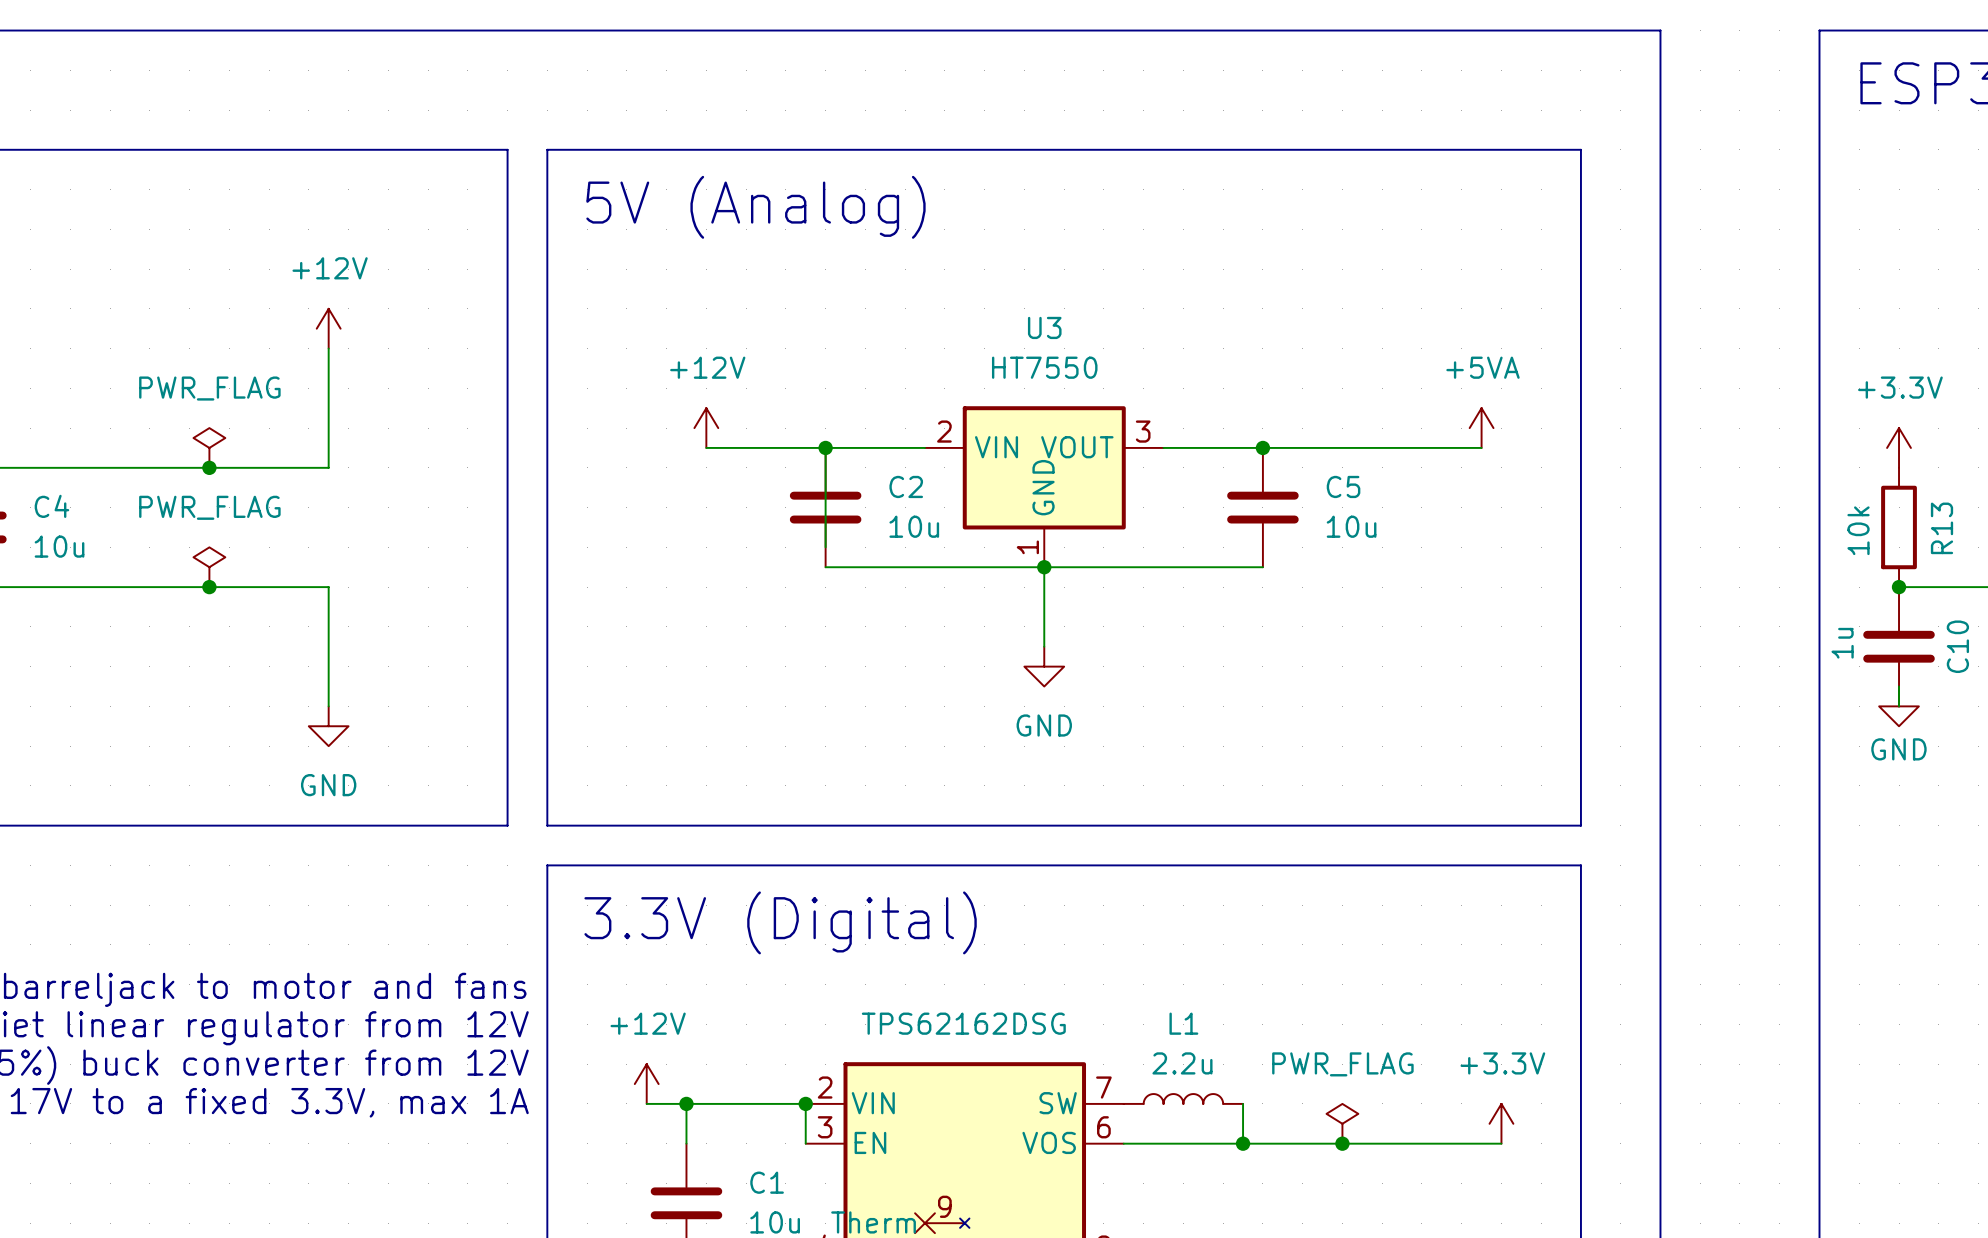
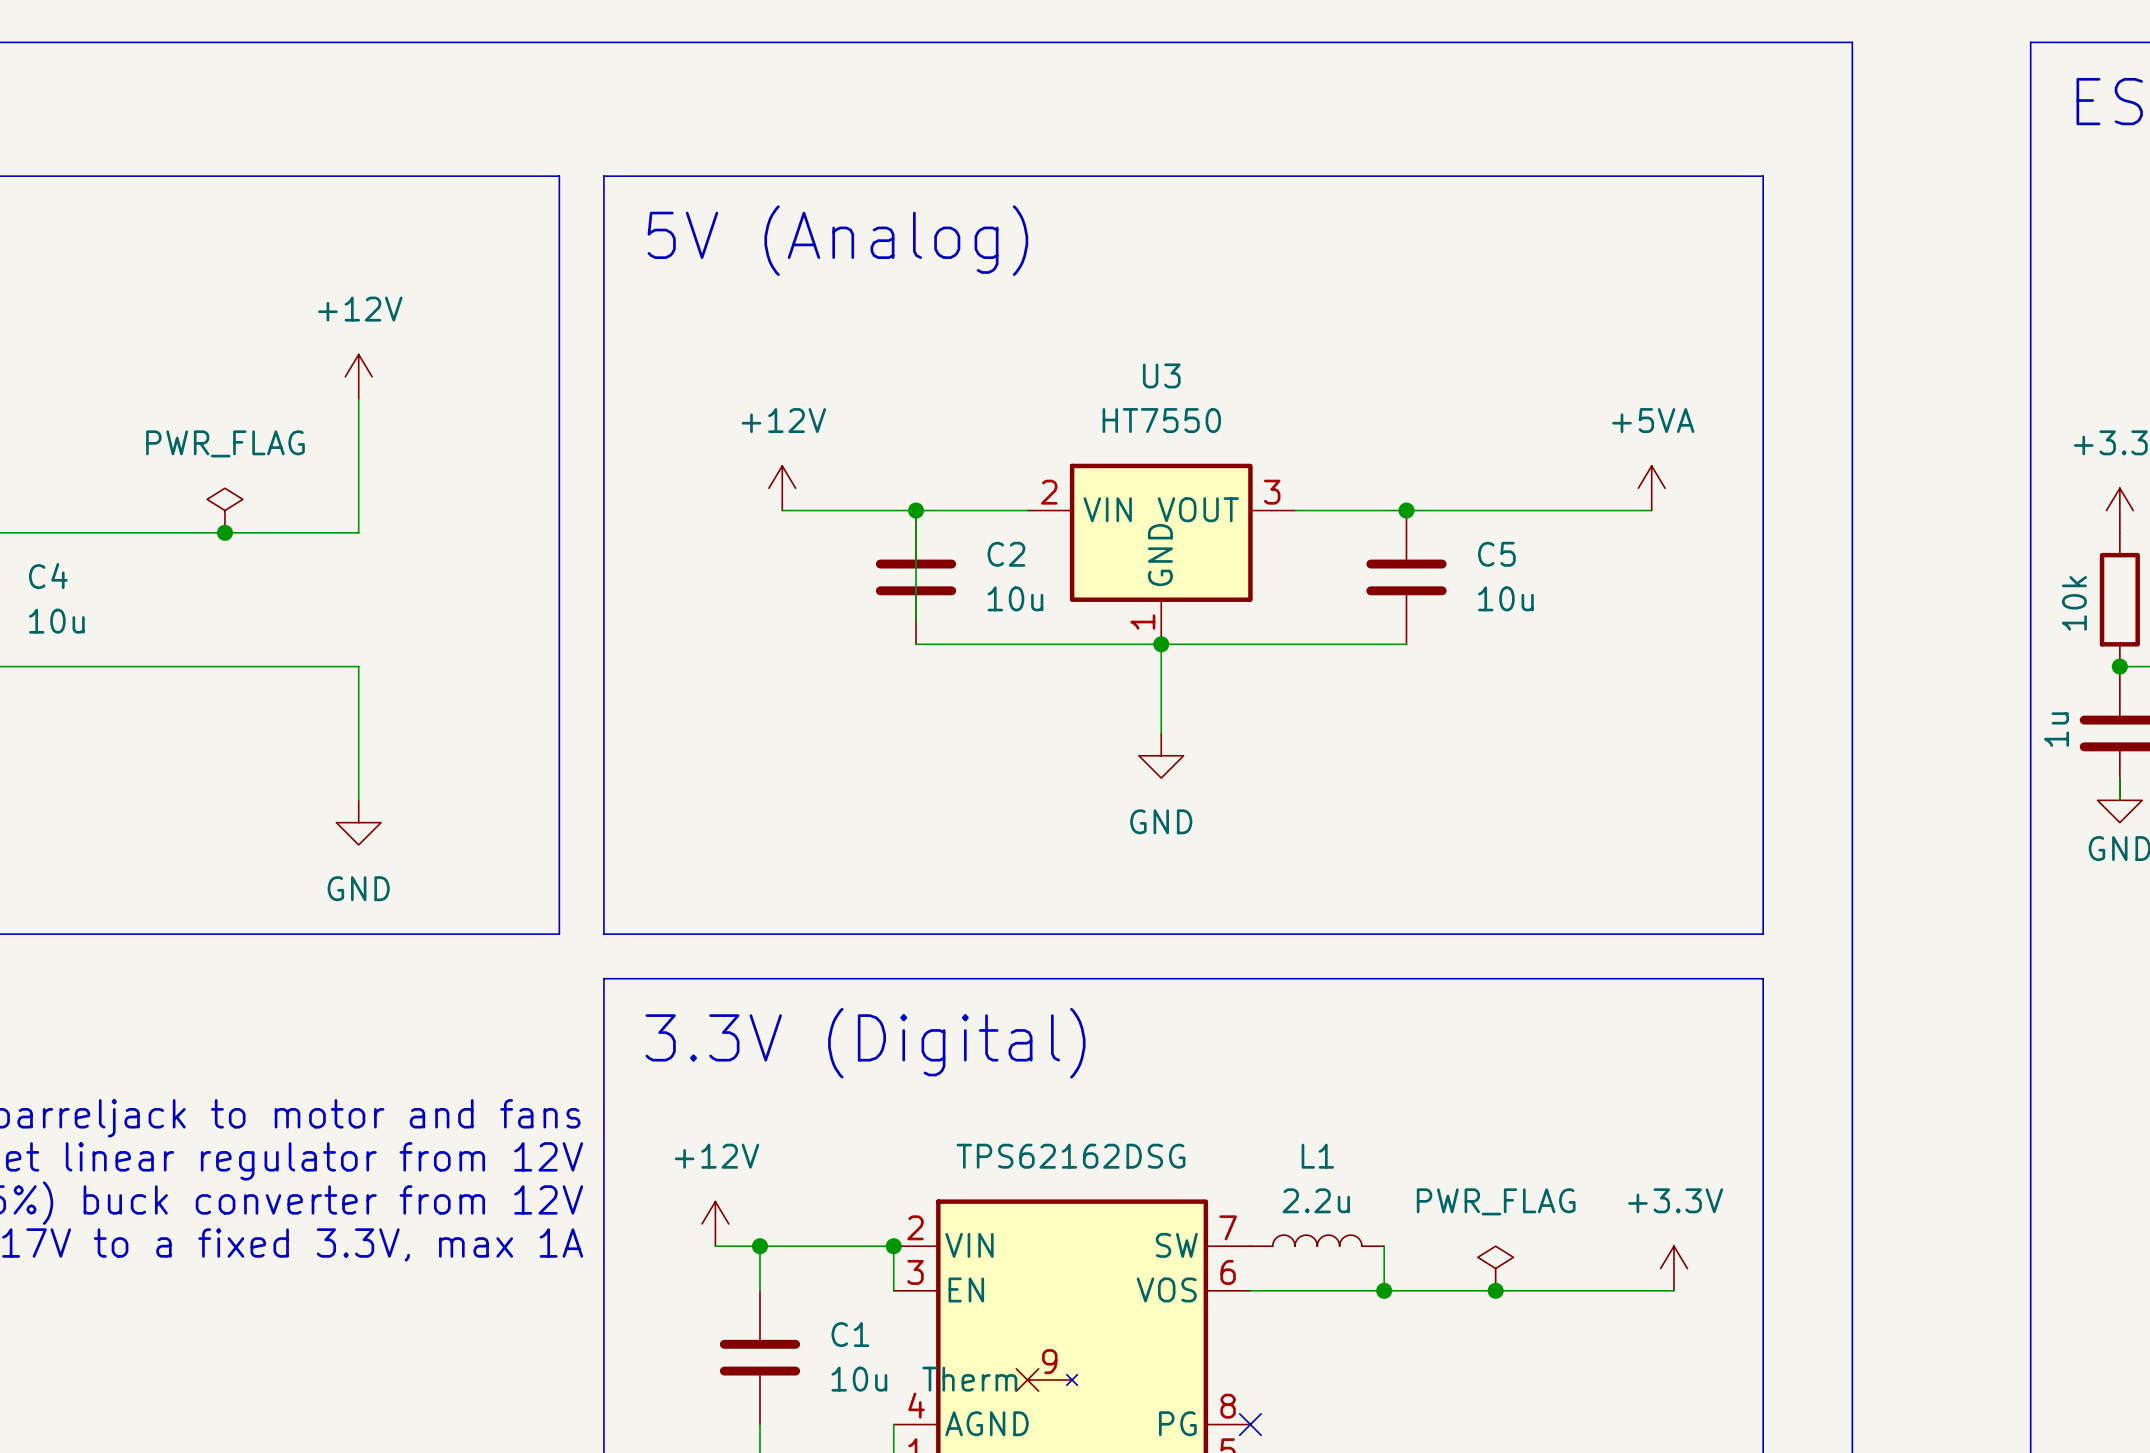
power symbol: PWR_FLAG (209, 567) -> none
junction: (209, 587) -> none

